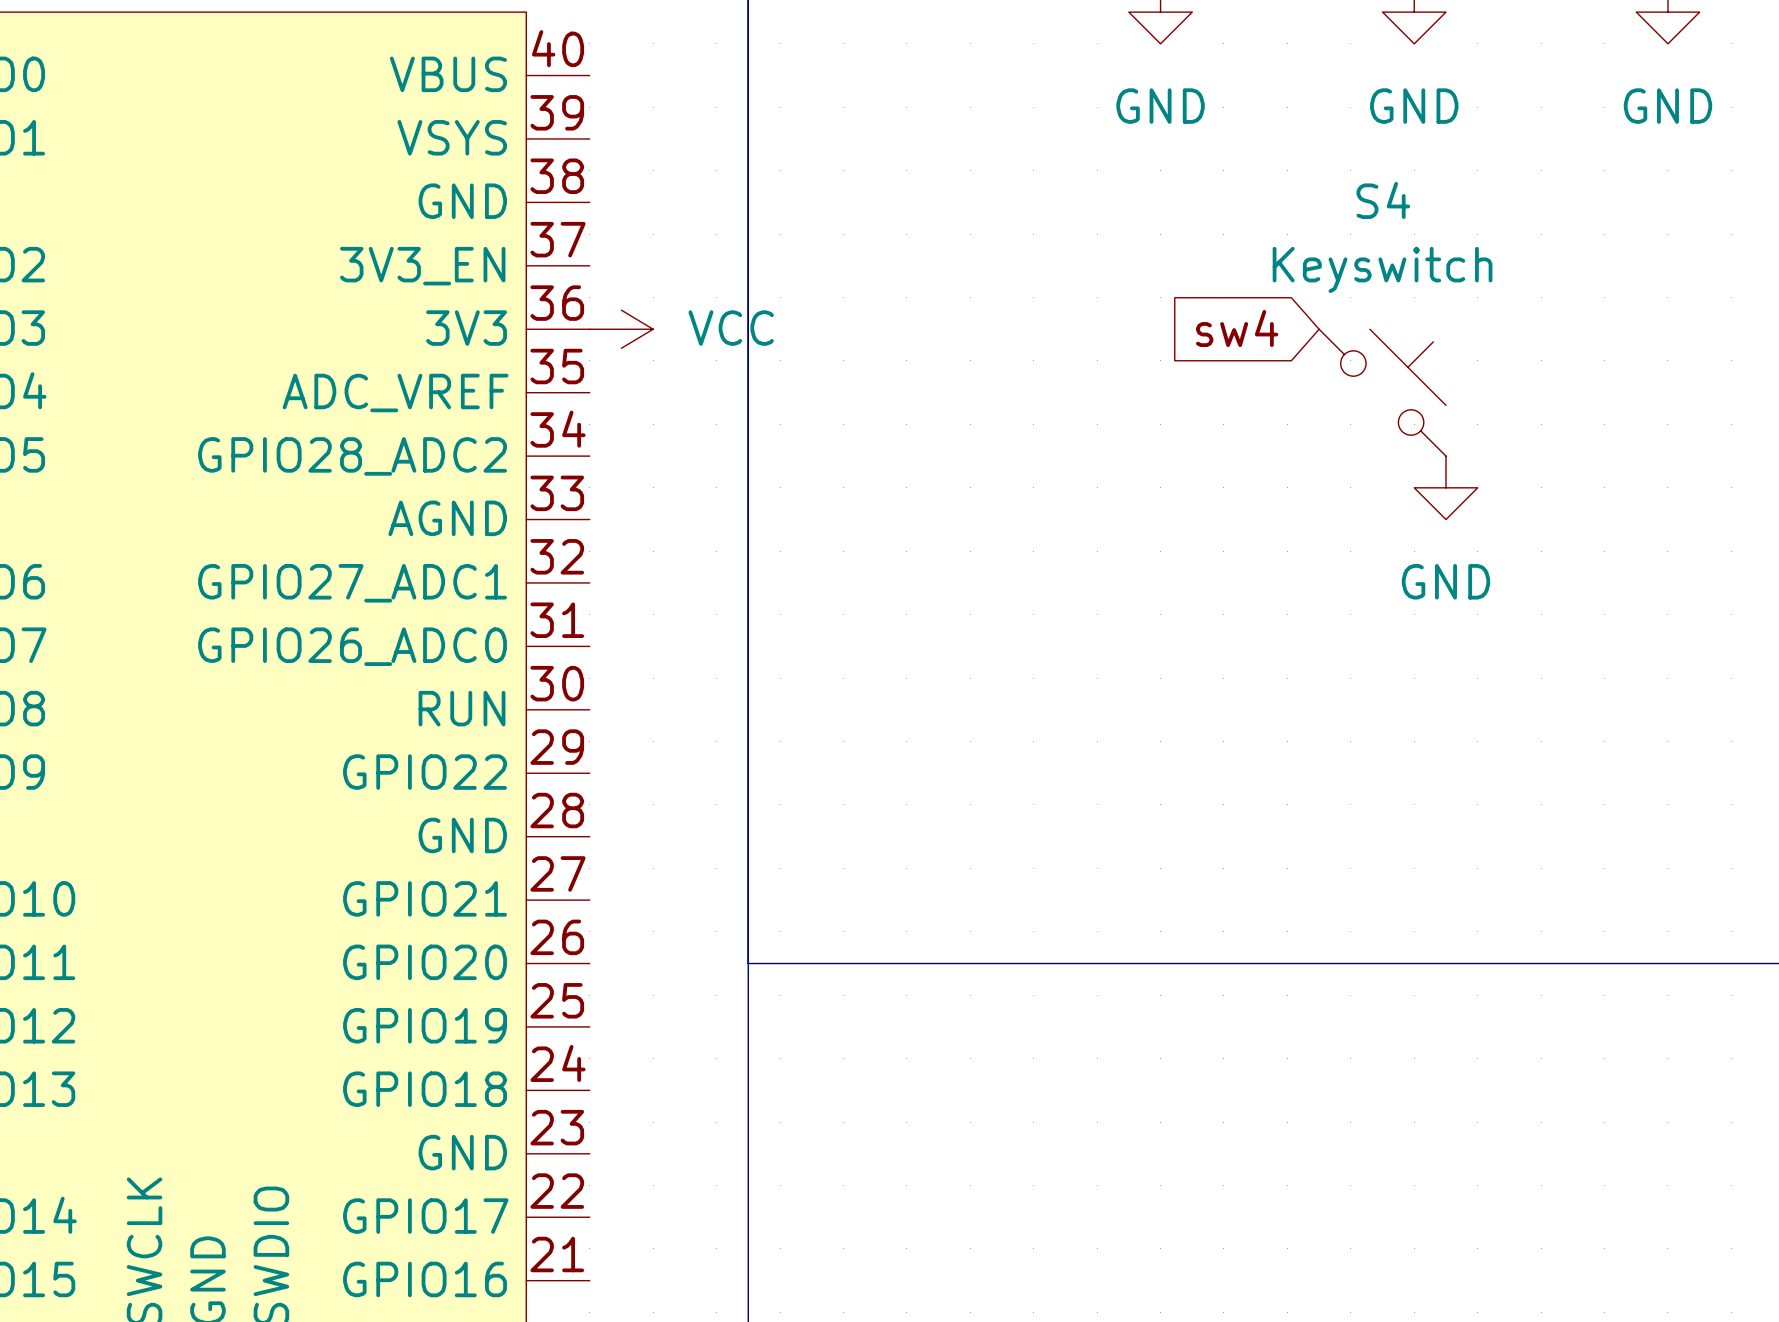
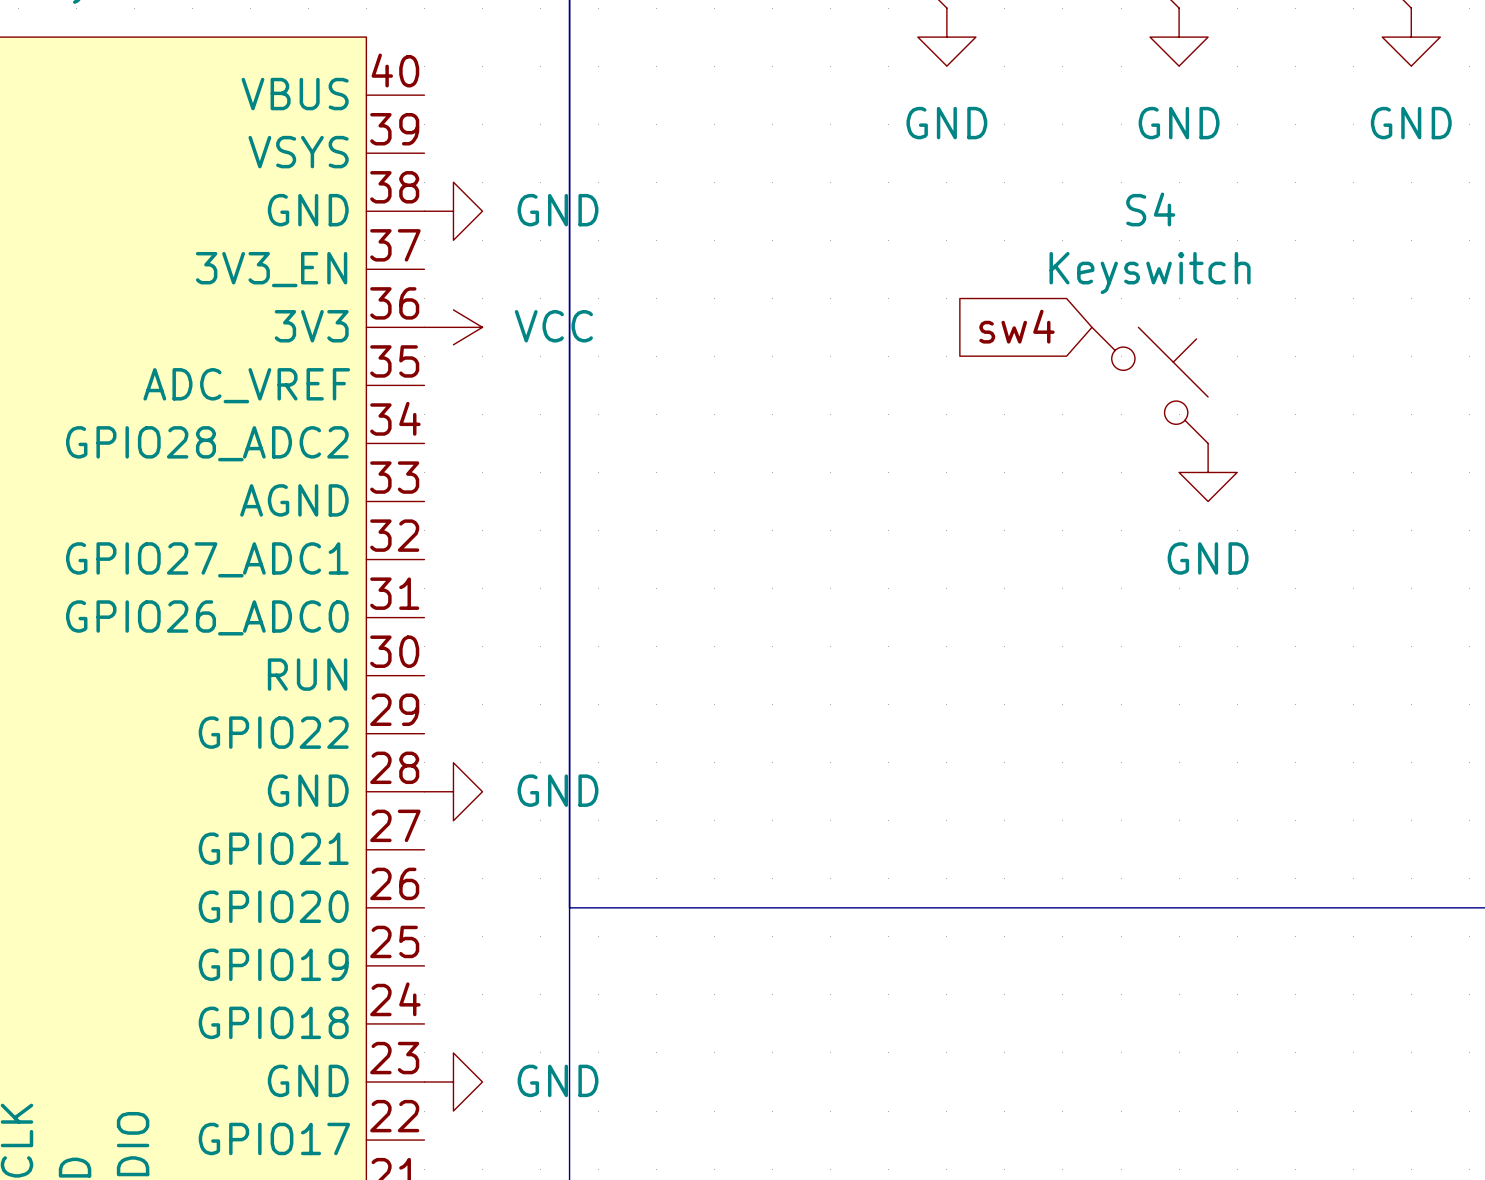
power symbol: none -> GND (453, 211)
power symbol: none -> GND (453, 791)
power symbol: none -> GND (453, 1082)

